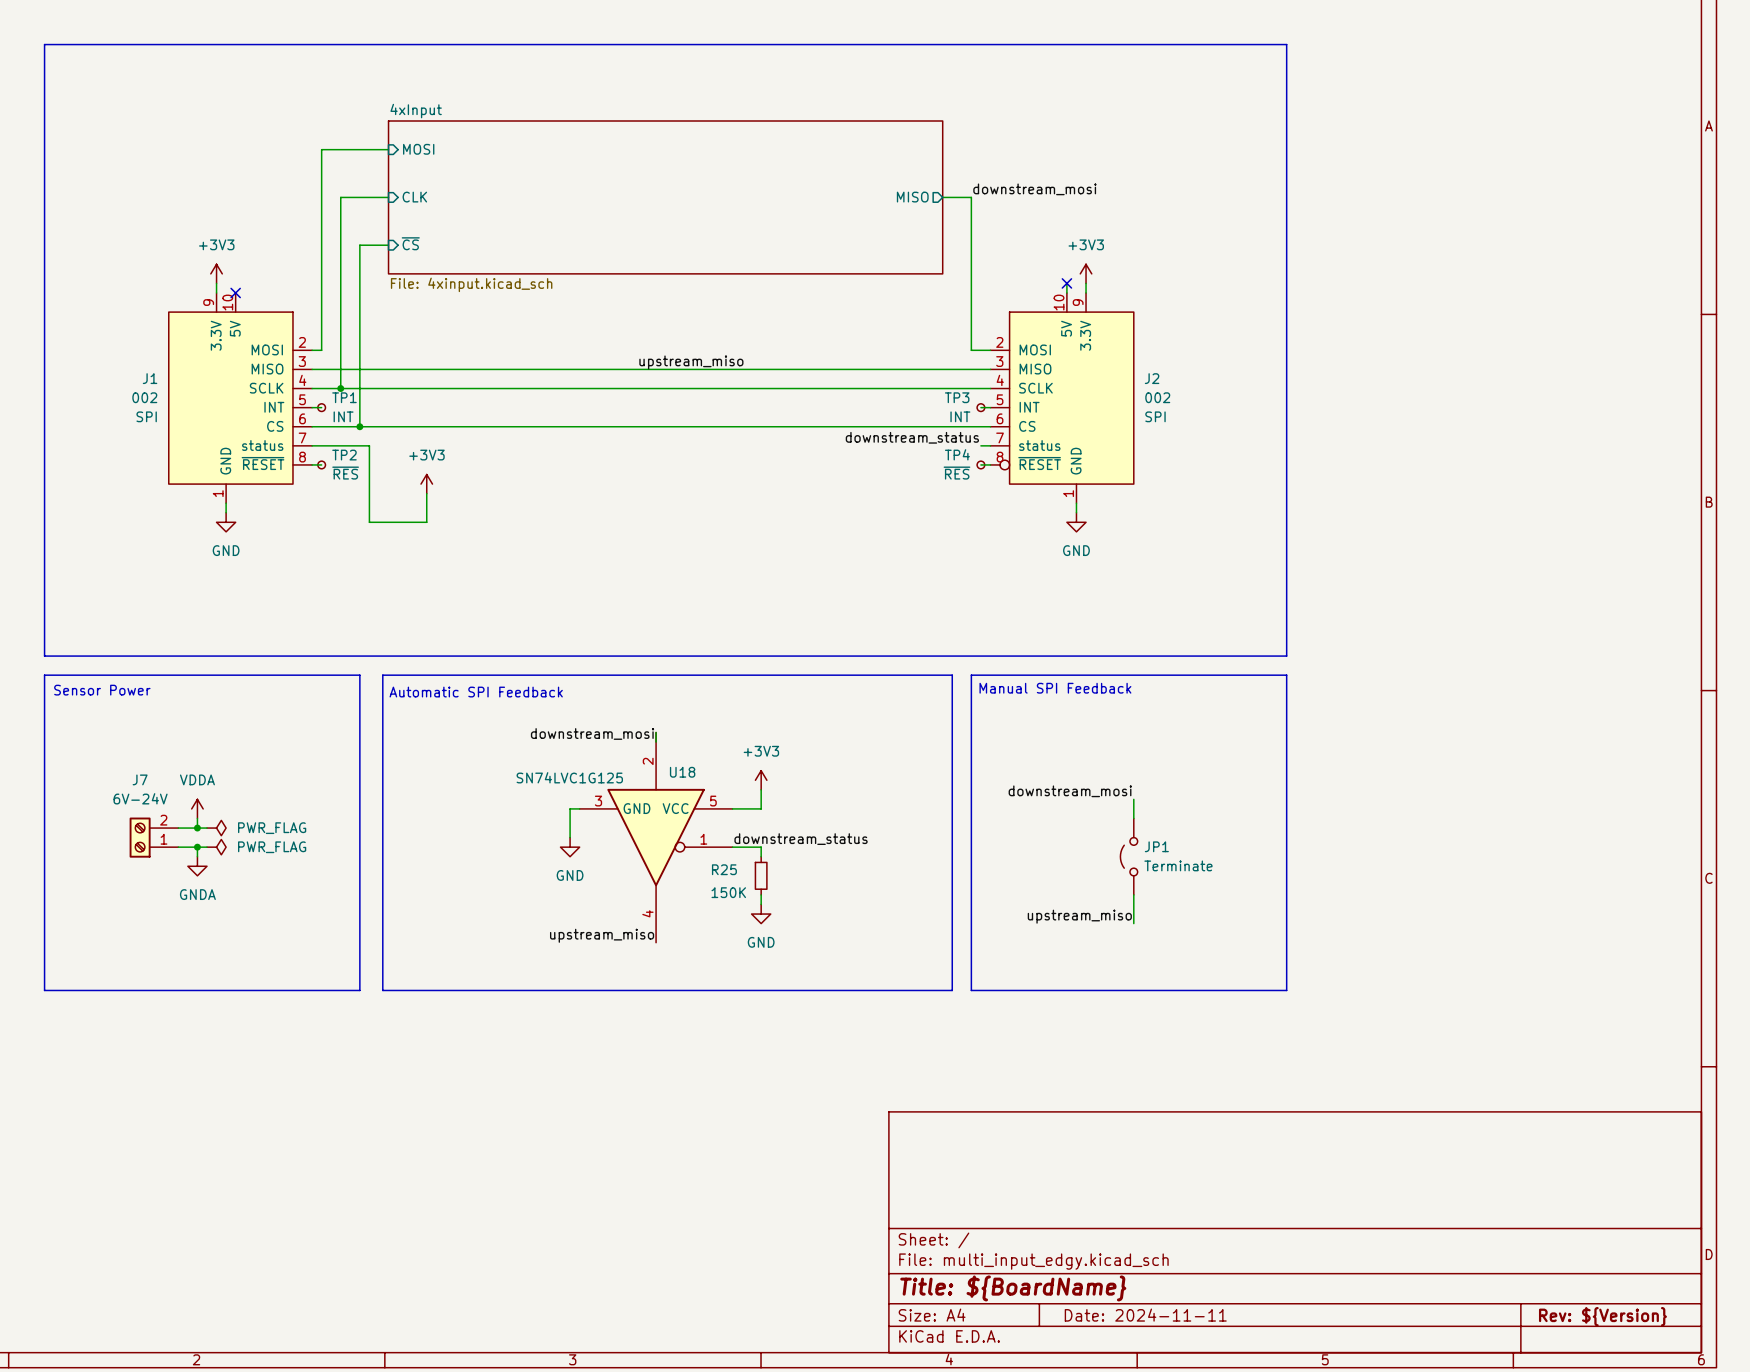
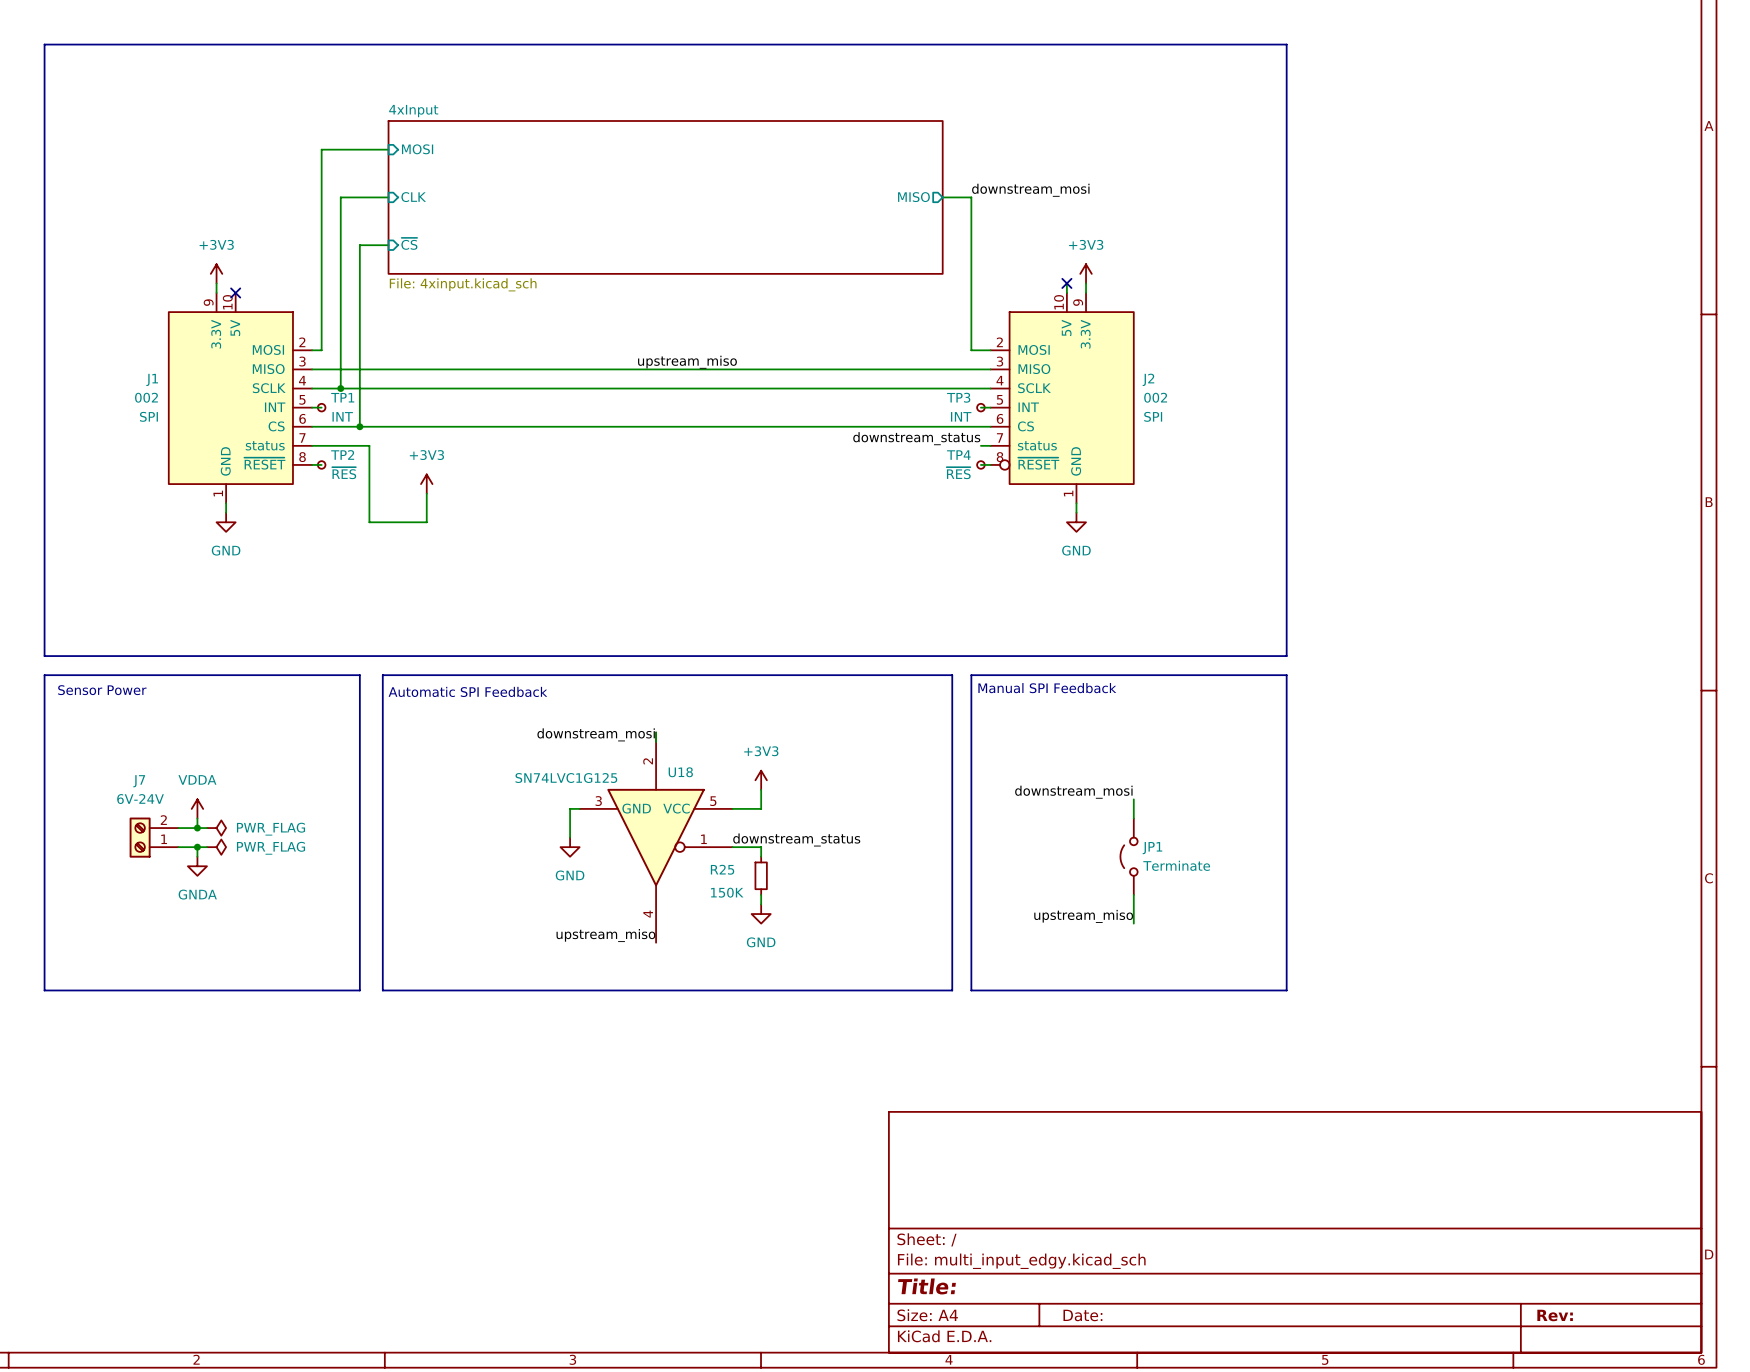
title block: Title: ${BoardName} (1013, 1288) -> Title: (926, 1286)
title block: Date: 2024-11-11 (1145, 1315) -> Date: (1082, 1315)
title block: Rev: ${Version} (1602, 1316) -> Rev: (1555, 1315)

